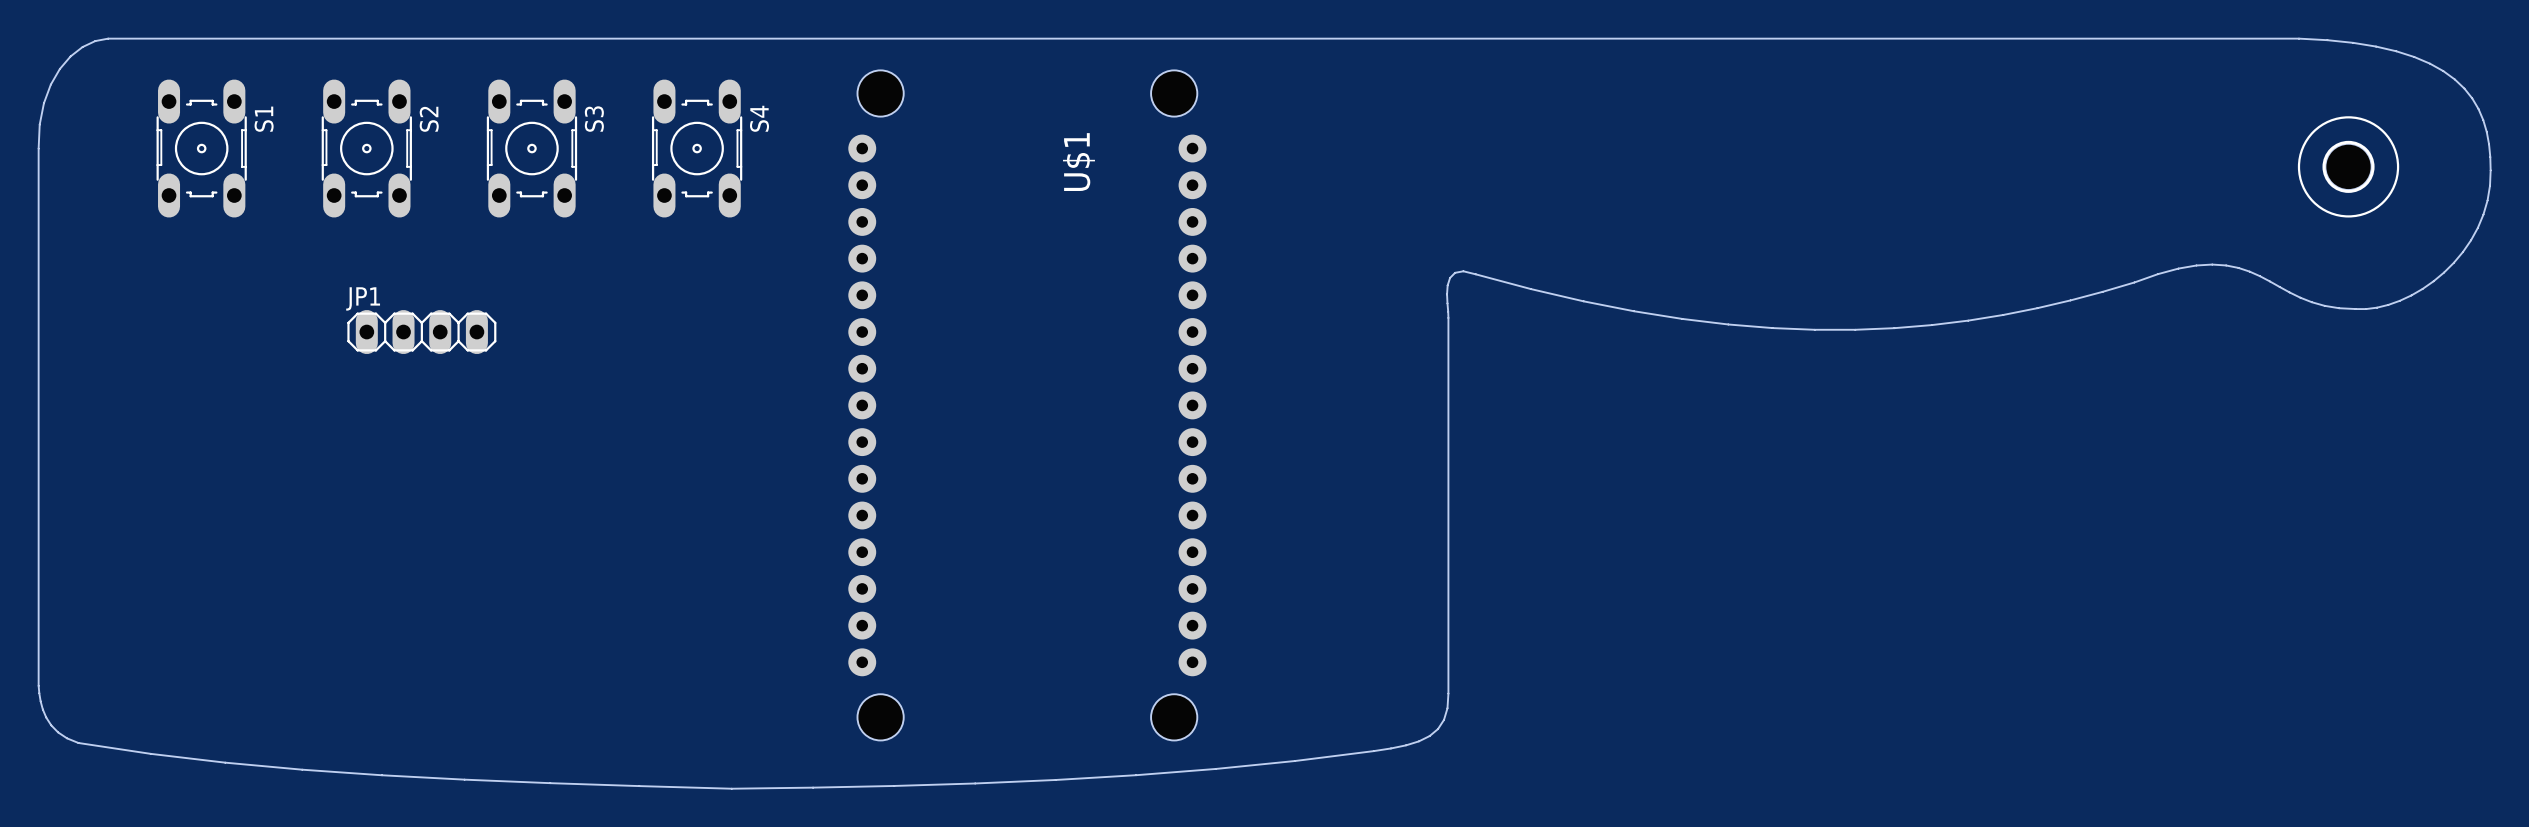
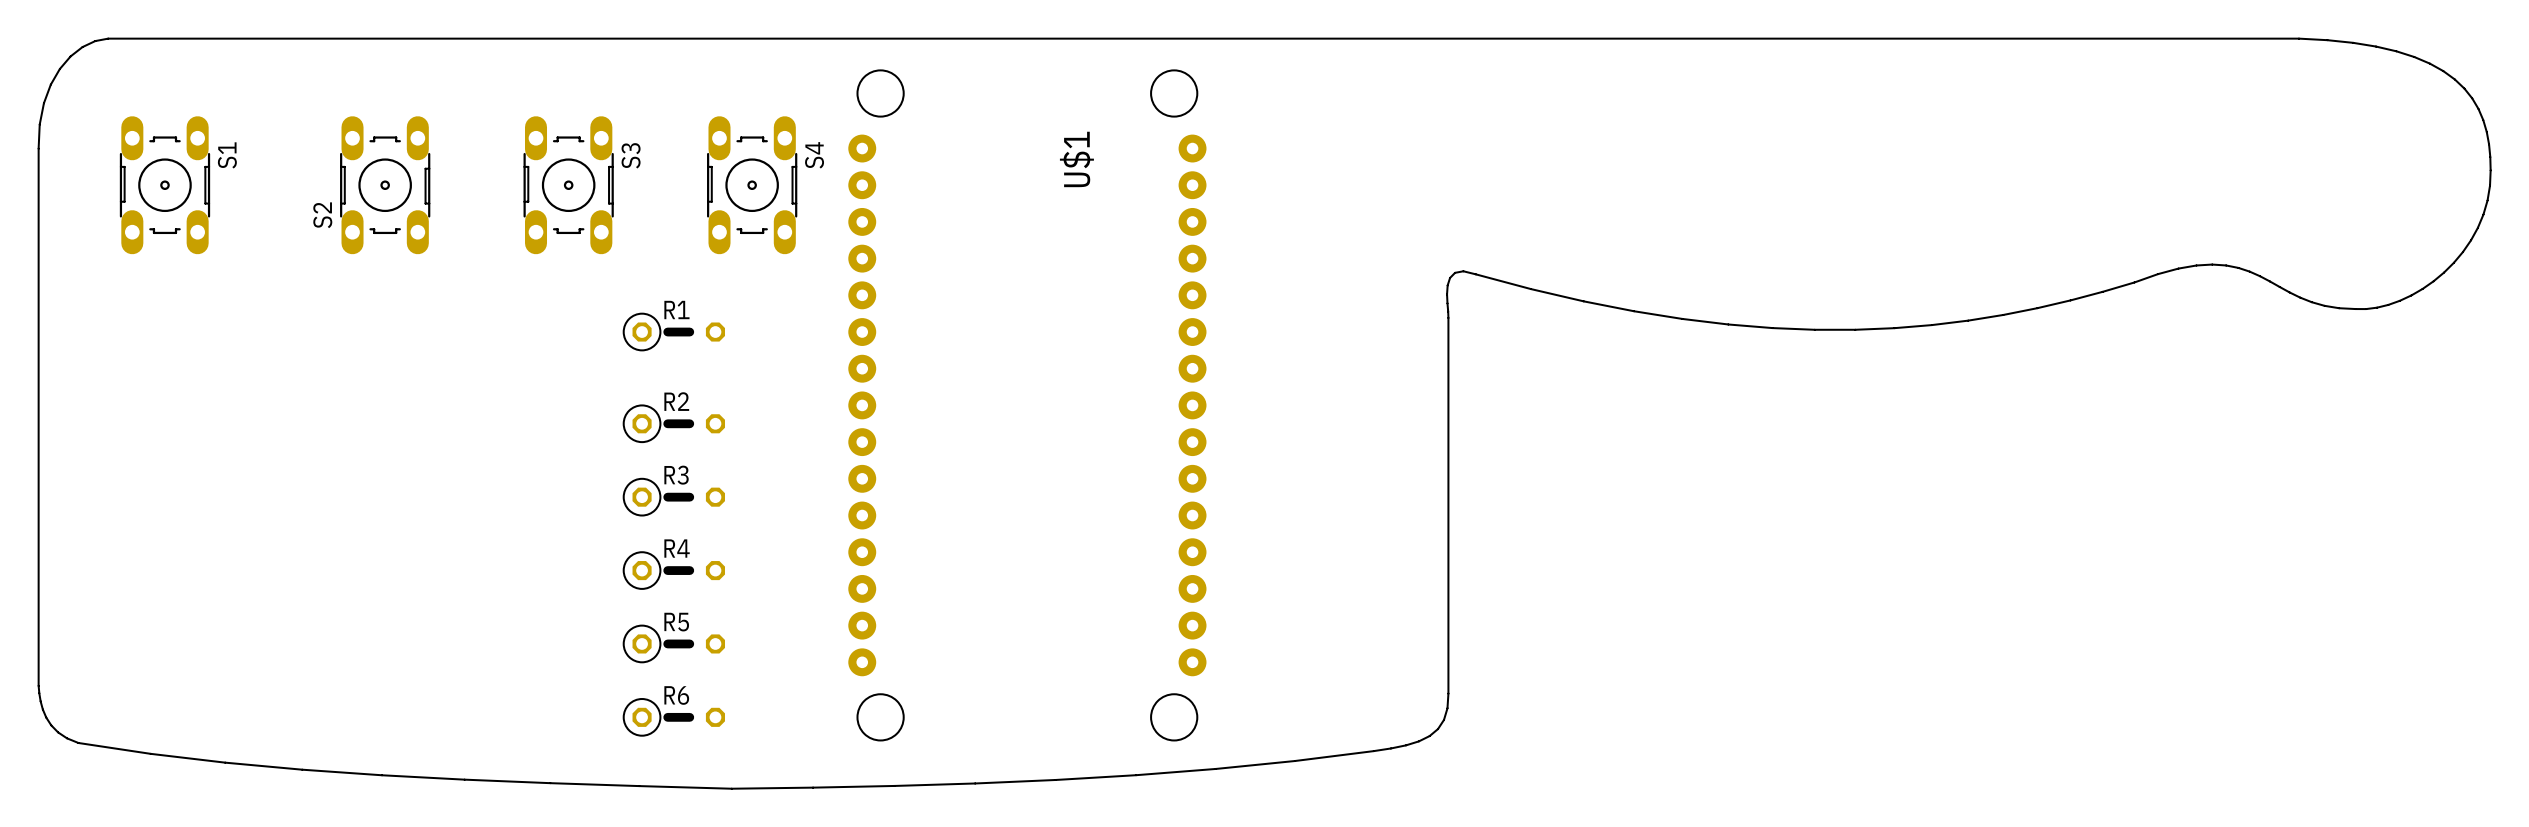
S1 position: (201, 148) -> (164, 185)
S2 rotation: 0° (366, 148) -> 180° (385, 185)
S3 position: (531, 148) -> (568, 185)
S4 position: (697, 148) -> (752, 185)
part: (2348, 166) -> none
JP1: (421, 332) -> none
R1: none -> (673, 332)
R2: none -> (673, 423)
R3: none -> (673, 497)
R4: none -> (673, 570)
R5: none -> (673, 643)
R6: none -> (673, 717)

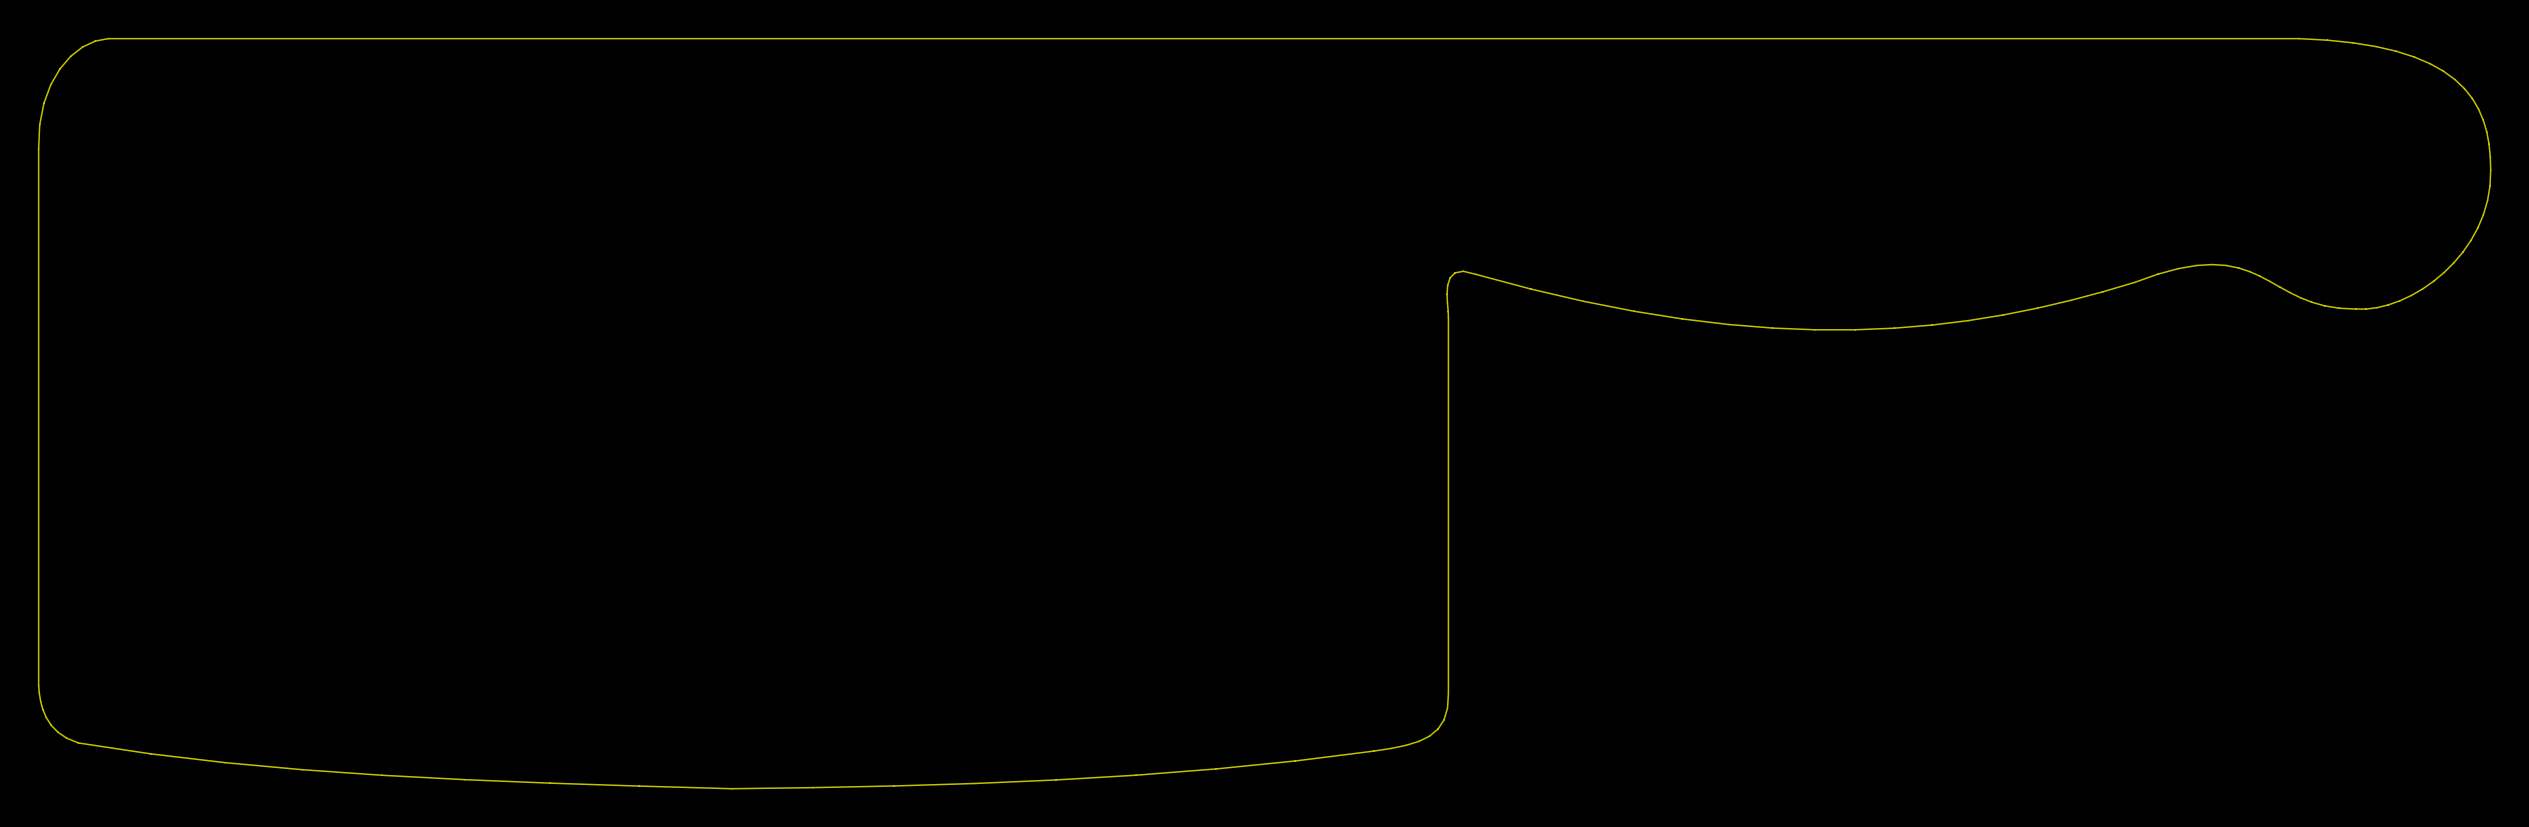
S1: (164, 185) -> none
S2: (385, 185) -> none
S3: (568, 185) -> none
S4: (752, 185) -> none
R1: (673, 332) -> none
U$1: (1027, 405) -> none
R2: (673, 423) -> none
R3: (673, 497) -> none
R4: (673, 570) -> none
R5: (673, 643) -> none
R6: (673, 717) -> none

